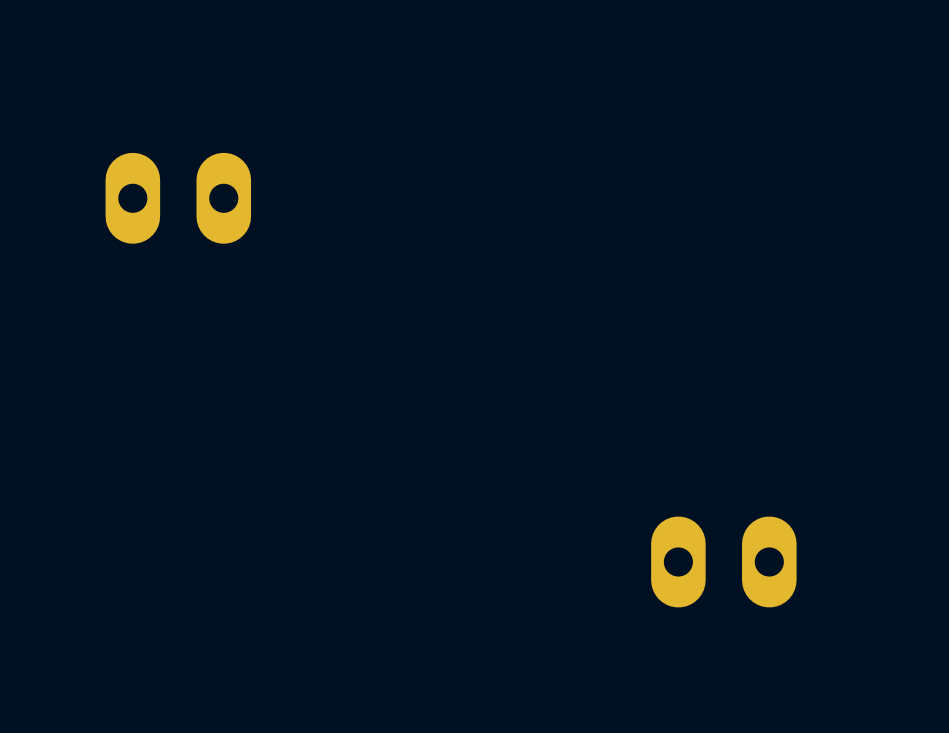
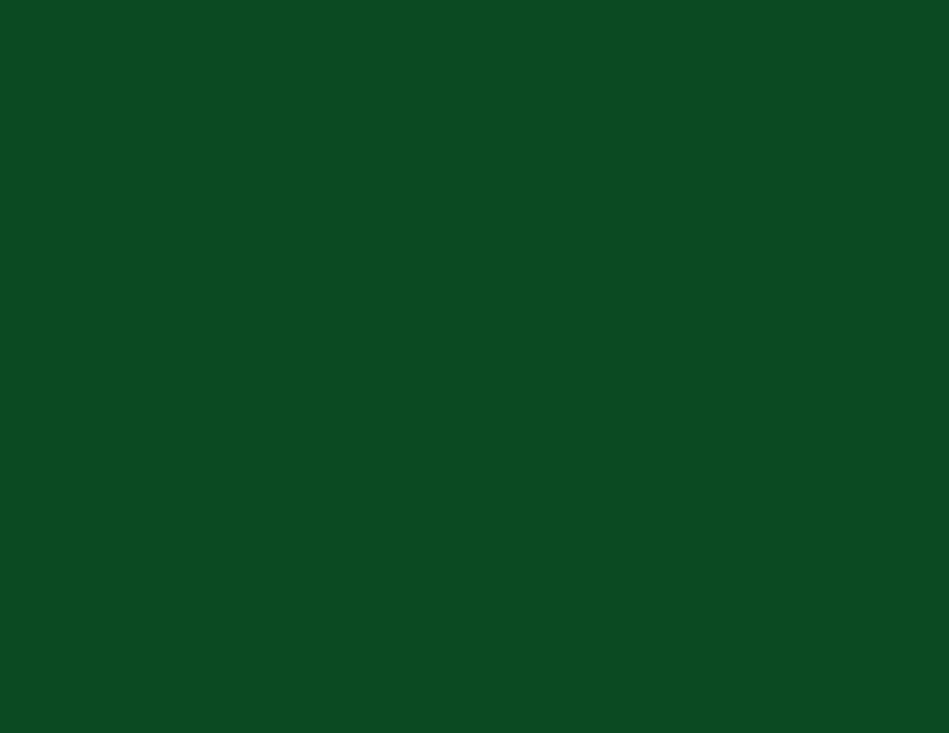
part: (178, 198) -> none
part: (723, 561) -> none

